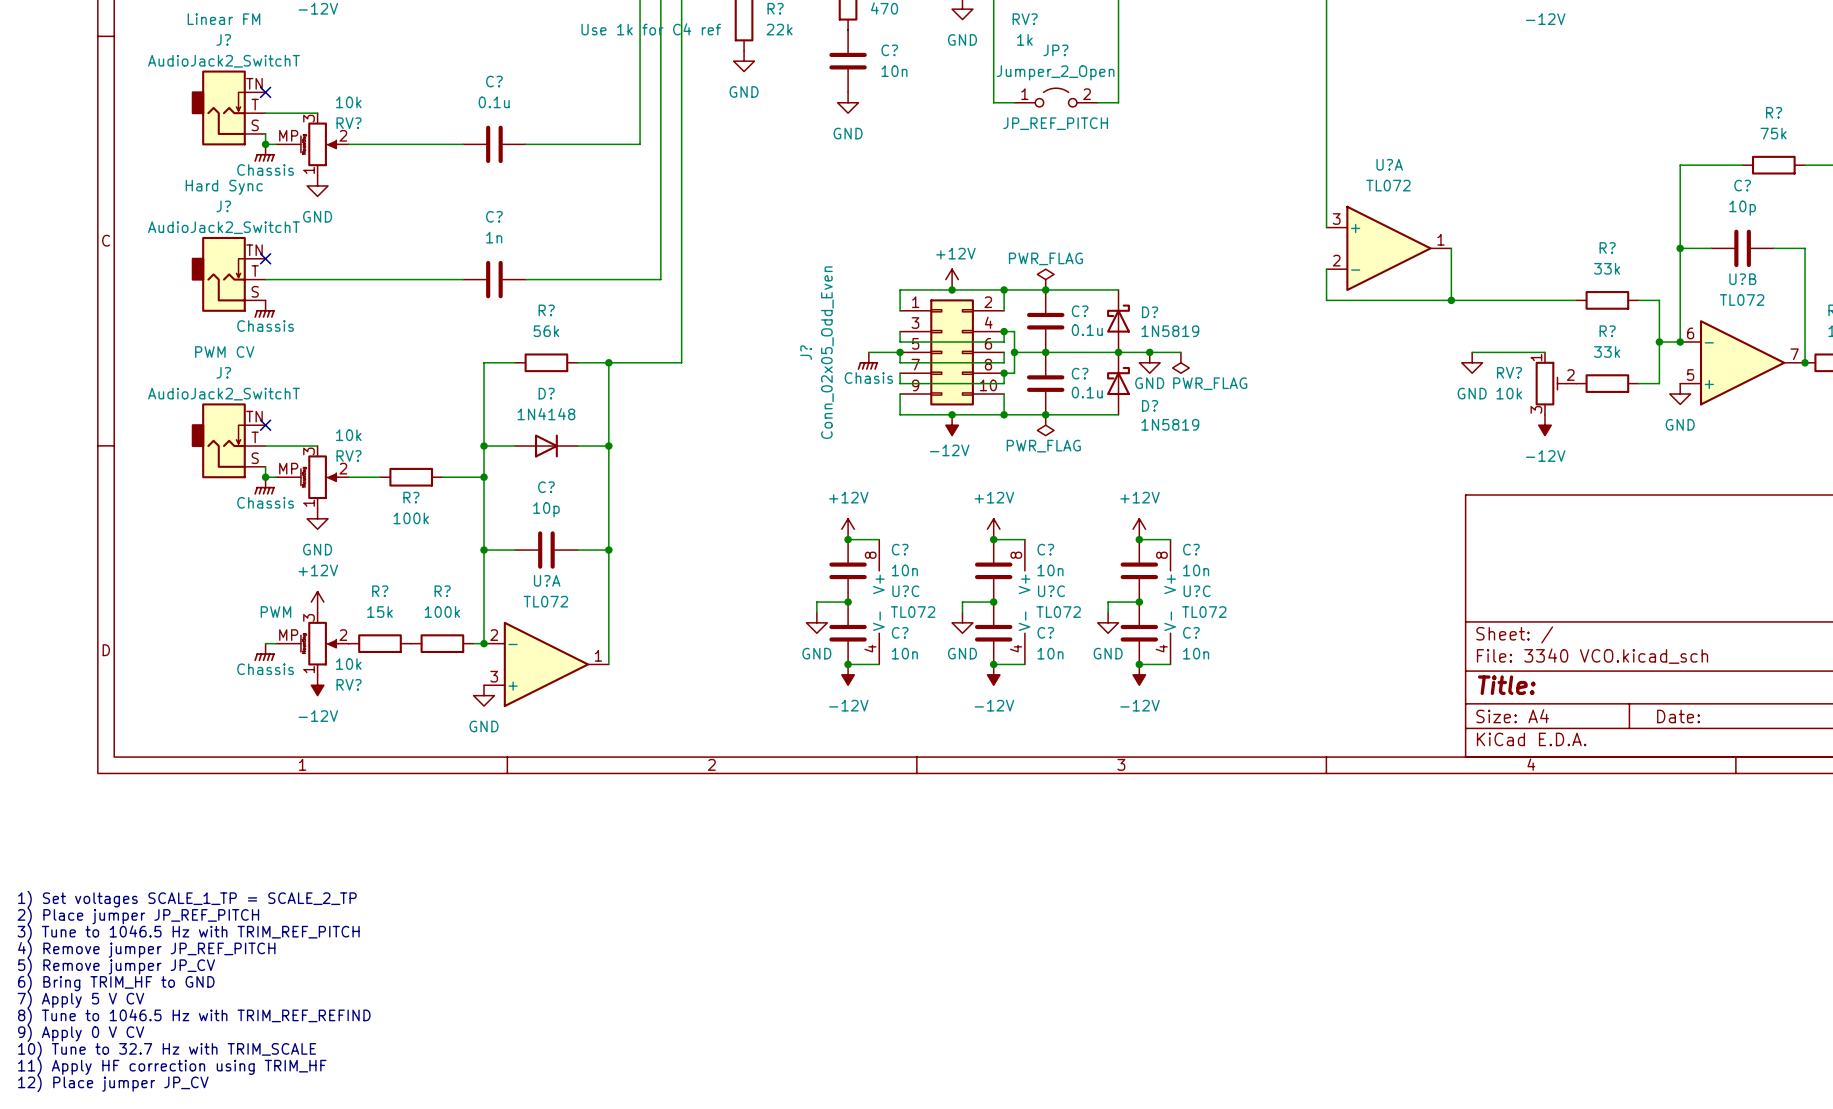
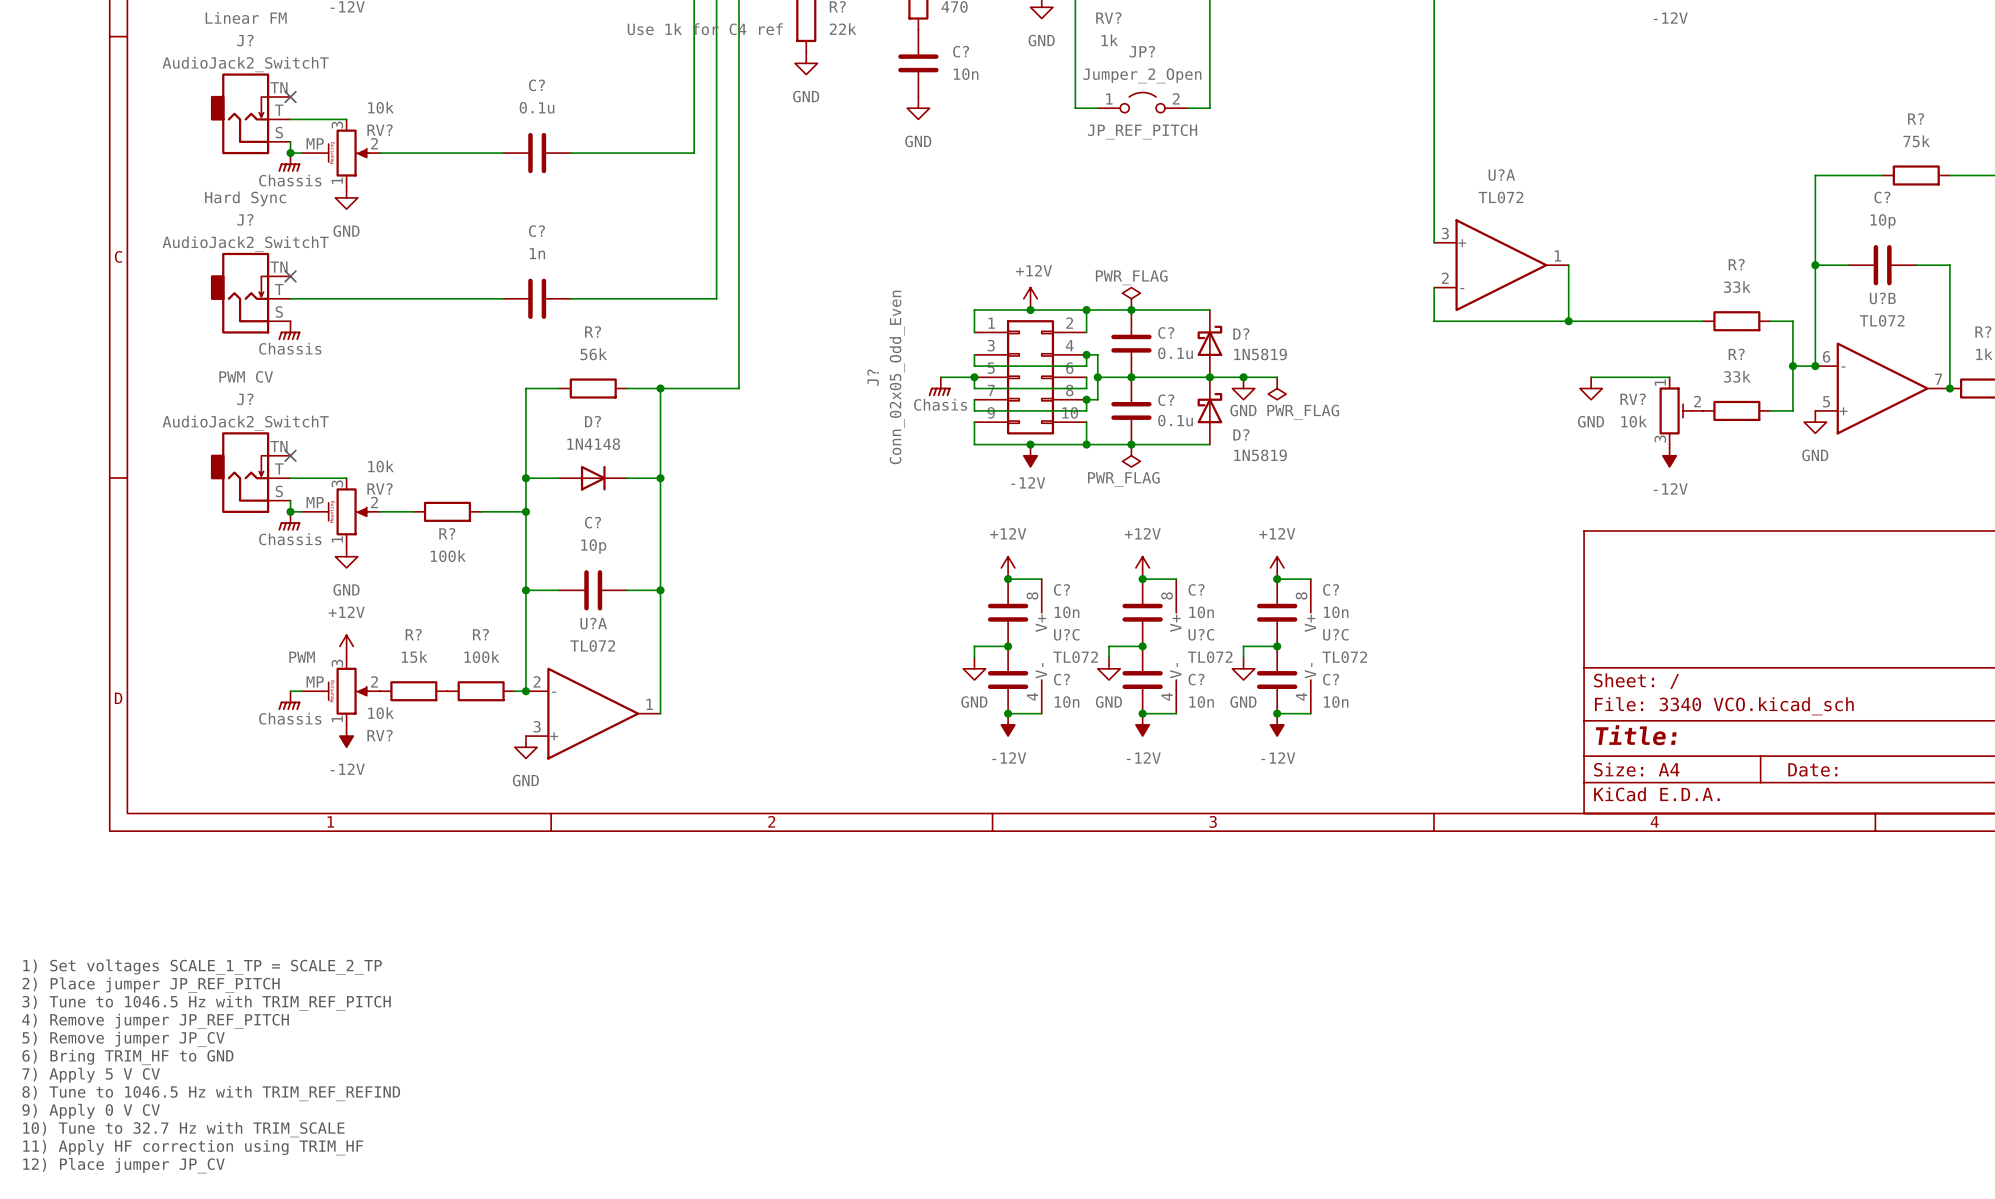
power symbol: +12V (848, 529) -> none
power symbol: none -> +12V (1008, 567)
power symbol: +12V (993, 529) -> none
power symbol: none -> +12V (1142, 567)
power symbol: +12V (1139, 529) -> none
power symbol: none -> +12V (1277, 567)
wire: (848, 539) (879, 539) -> none
junction: (848, 539) -> none
junction: none -> (1008, 579)
wire: (993, 539) (1024, 539) -> (1008, 579) (1041, 579)
junction: (993, 539) -> none
wire: none -> (1142, 579) (1176, 579)
junction: none -> (1142, 579)
wire: (1139, 539) (1170, 539) -> (1277, 579) (1310, 579)
junction: (1139, 539) -> none
junction: none -> (1277, 579)
C?: 10n (848, 570) -> none
C?: none -> 10n (1008, 612)
C?: 10n (993, 570) -> none
C?: none -> 10n (1142, 612)
C?: 10n (1139, 570) -> none
C?: none -> 10n (1277, 612)
wire: (848, 602) (816, 602) (816, 612) -> none
junction: (848, 602) -> none
U?C: TL072 (879, 602) -> none
junction: none -> (1008, 646)
U?C: none -> TL072 (1041, 646)
wire: (993, 602) (962, 602) (962, 612) -> (1008, 646) (974, 646) (974, 657)
junction: (993, 602) -> none
U?C: TL072 (1024, 602) -> none
wire: none -> (1142, 646) (1109, 646) (1109, 657)
junction: none -> (1142, 646)
U?C: none -> TL072 (1176, 646)
wire: (1139, 602) (1108, 602) (1108, 612) -> (1277, 646) (1243, 646) (1243, 657)
junction: (1139, 602) -> none
U?C: TL072 (1170, 602) -> none
junction: none -> (1277, 646)
U?C: none -> TL072 (1310, 646)
power symbol: GND (816, 622) -> none
power symbol: none -> GND (974, 668)
power symbol: GND (962, 622) -> none
power symbol: none -> GND (1109, 668)
power symbol: GND (1108, 622) -> none
power symbol: none -> GND (1243, 668)
C?: 10n (848, 633) -> none
C?: none -> 10n (1008, 680)
C?: 10n (993, 633) -> none
C?: none -> 10n (1142, 680)
C?: 10n (1139, 633) -> none
C?: none -> 10n (1277, 680)
wire: (848, 664) (879, 664) -> none
junction: (848, 664) -> none
junction: none -> (1008, 713)
wire: (993, 664) (1024, 664) -> (1008, 713) (1041, 713)
junction: (993, 664) -> none
wire: none -> (1142, 713) (1176, 713)
junction: none -> (1142, 713)
wire: (1139, 664) (1170, 664) -> (1277, 713) (1310, 713)
junction: (1139, 664) -> none
junction: none -> (1277, 713)
power symbol: -12V (848, 674) -> none
power symbol: none -> -12V (1008, 724)
power symbol: -12V (993, 674) -> none
power symbol: none -> -12V (1142, 724)
power symbol: -12V (1139, 674) -> none
power symbol: none -> -12V (1277, 724)

